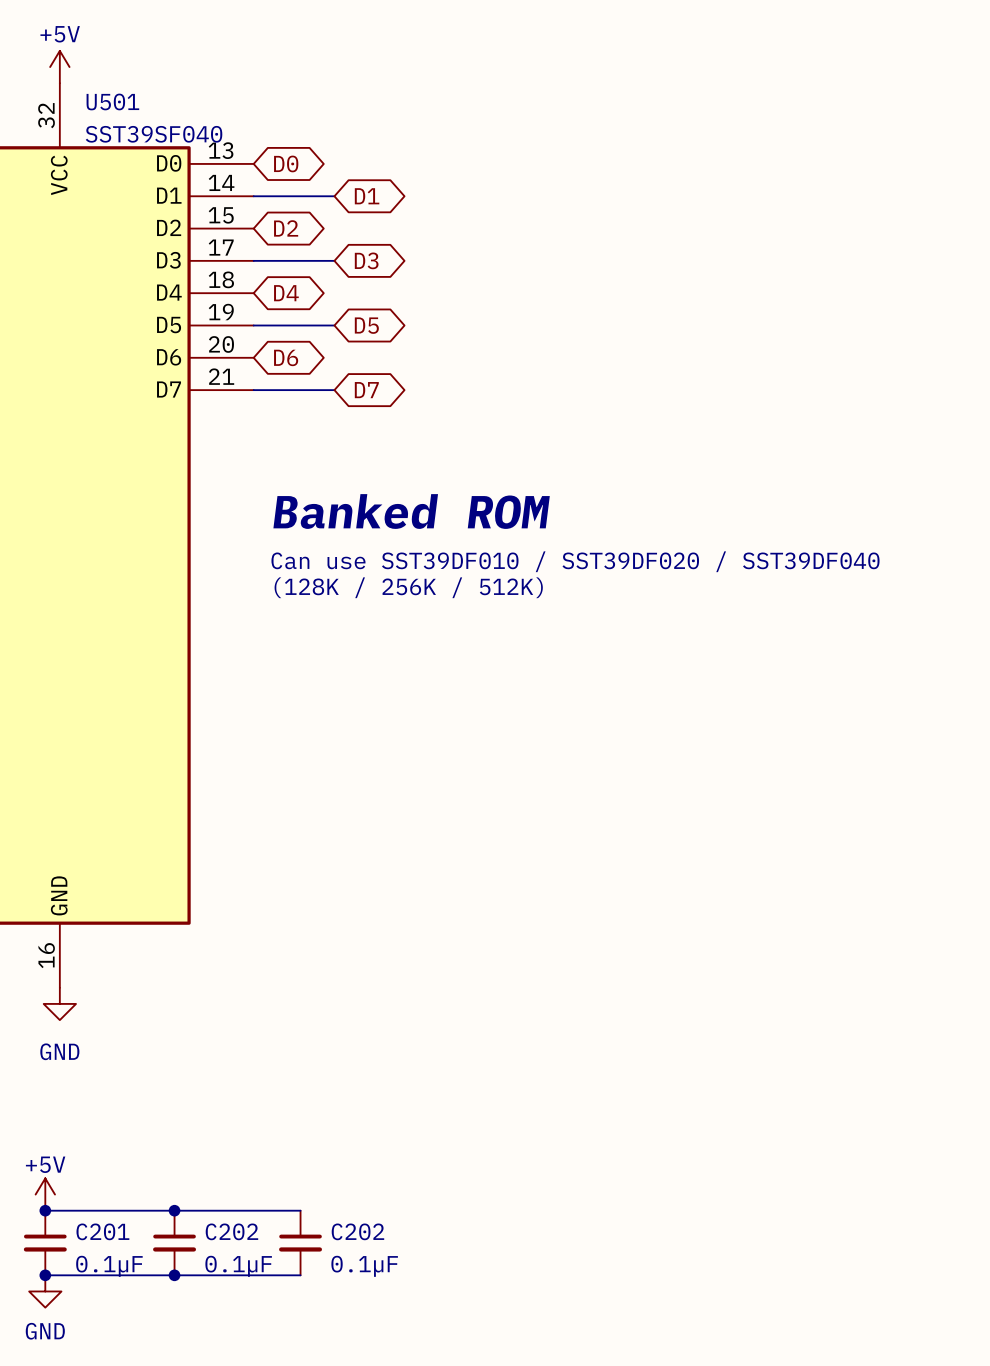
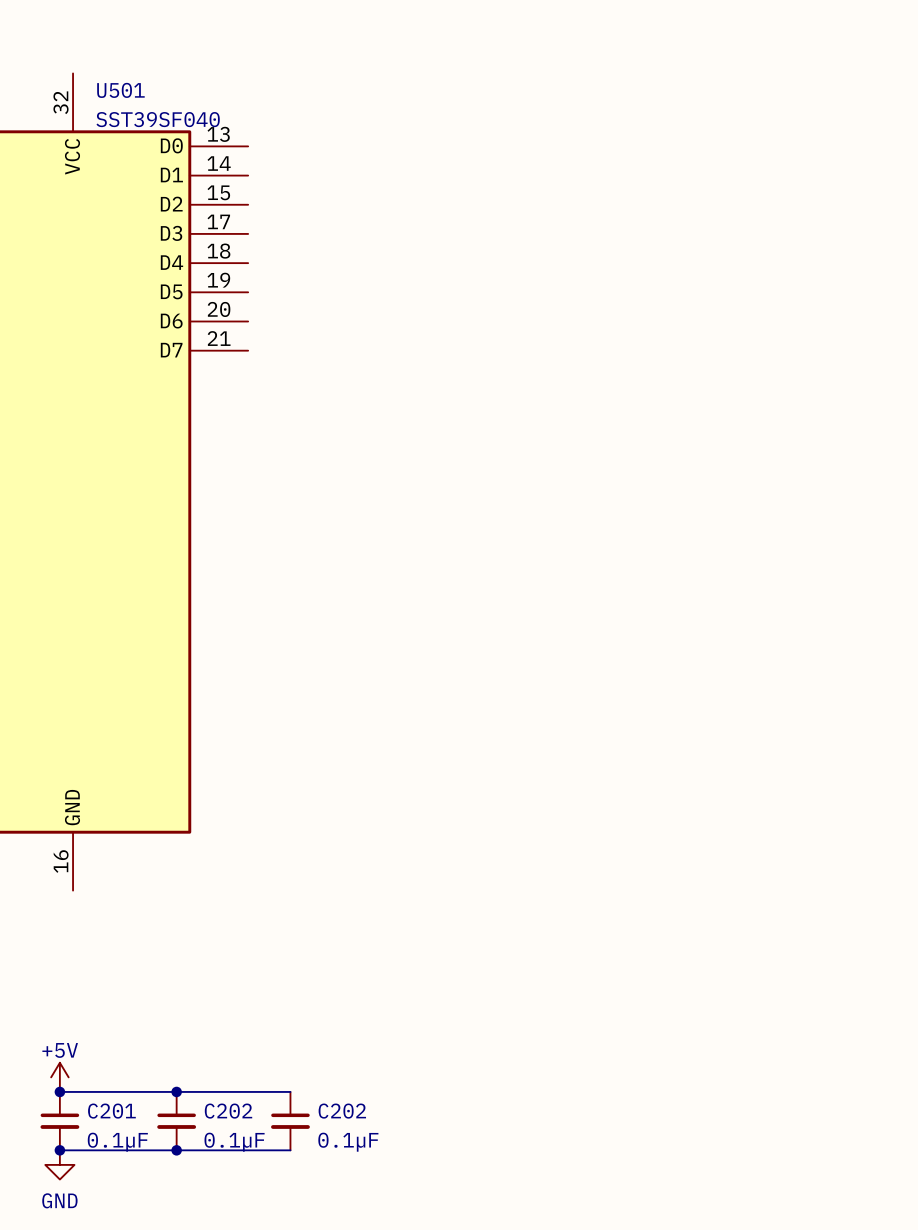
power symbol: +5V (59, 67) -> none
global label: D0 (286, 163) -> none
wire: (253, 196) (334, 196) -> none
global label: D1 (367, 196) -> none
global label: D2 (286, 228) -> none
wire: (253, 260) (334, 260) -> none
global label: D3 (366, 260) -> none
global label: D4 (286, 293) -> none
wire: (253, 325) (334, 325) -> none
global label: D5 (366, 325) -> none
global label: D6 (286, 357) -> none
wire: (253, 390) (334, 390) -> none
global label: D7 (366, 390) -> none
text: Banked ROM (411, 511) -> none
text: Can use SST39DF010 / SST39DF020 / SST39DF040 (575, 561) -> none
text: (128K / 256K / 512K) (408, 587) -> none
power symbol: GND (59, 1003) -> none

